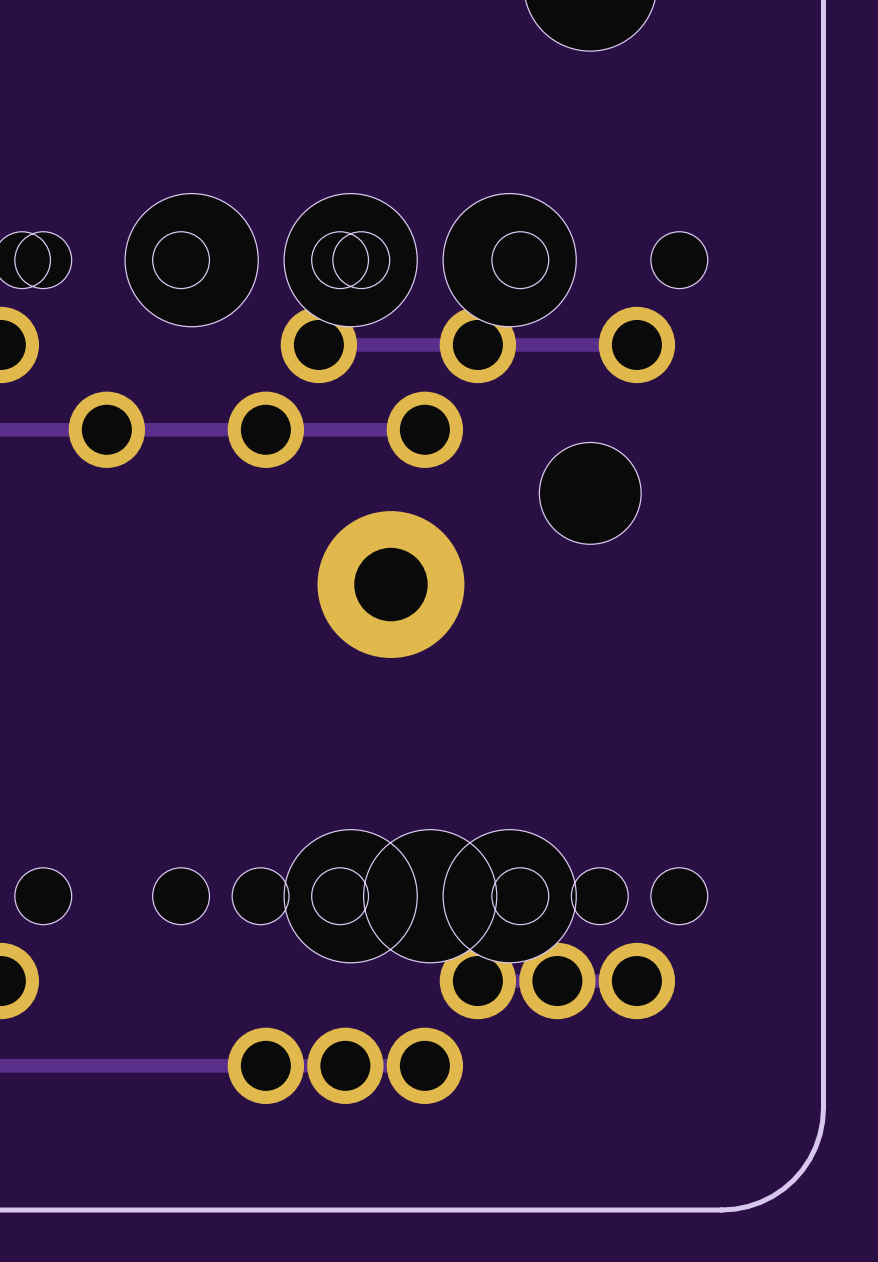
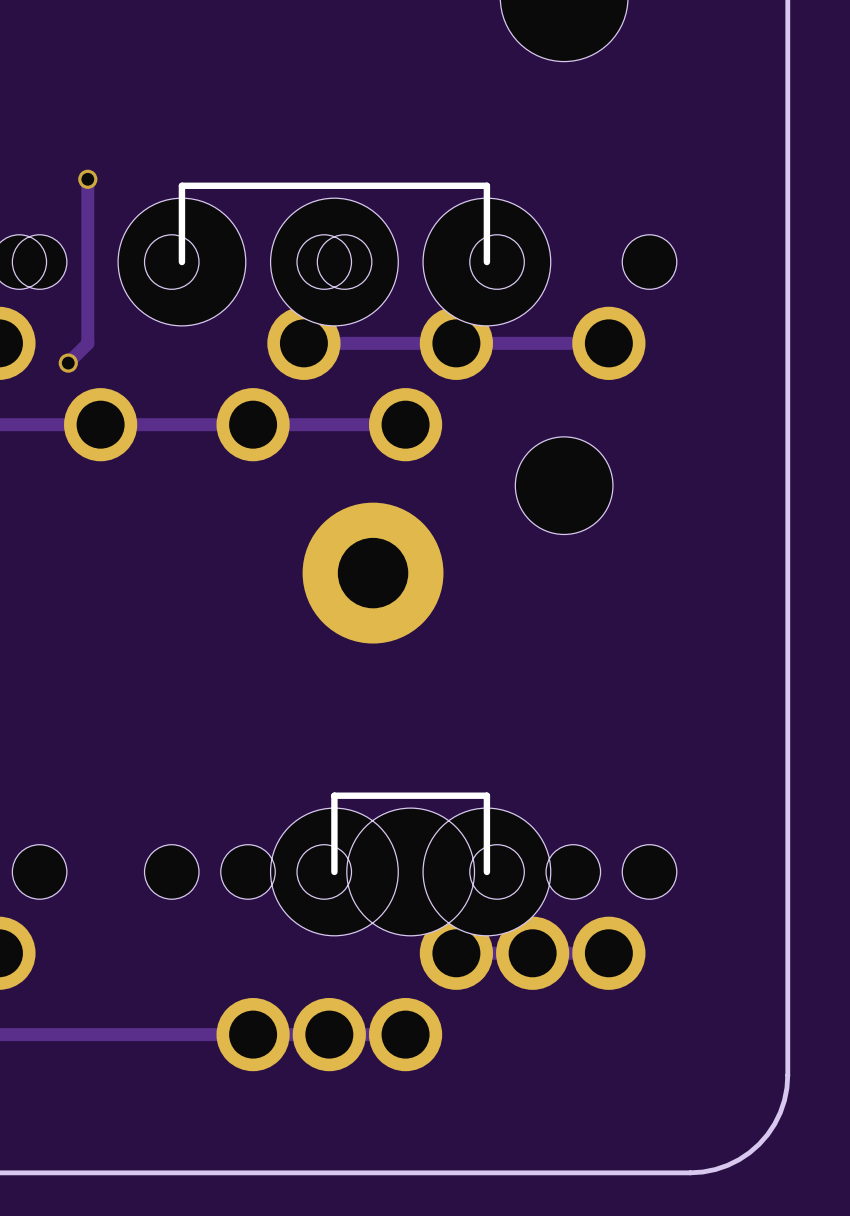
track: none -> (87, 179) (87, 343) (68, 363)
via: none -> (87, 179)
line: none -> (181, 262) (181, 185) (486, 185) (486, 262)
via: none -> (68, 363)
line: none -> (334, 871) (334, 795) (486, 795) (486, 871)

